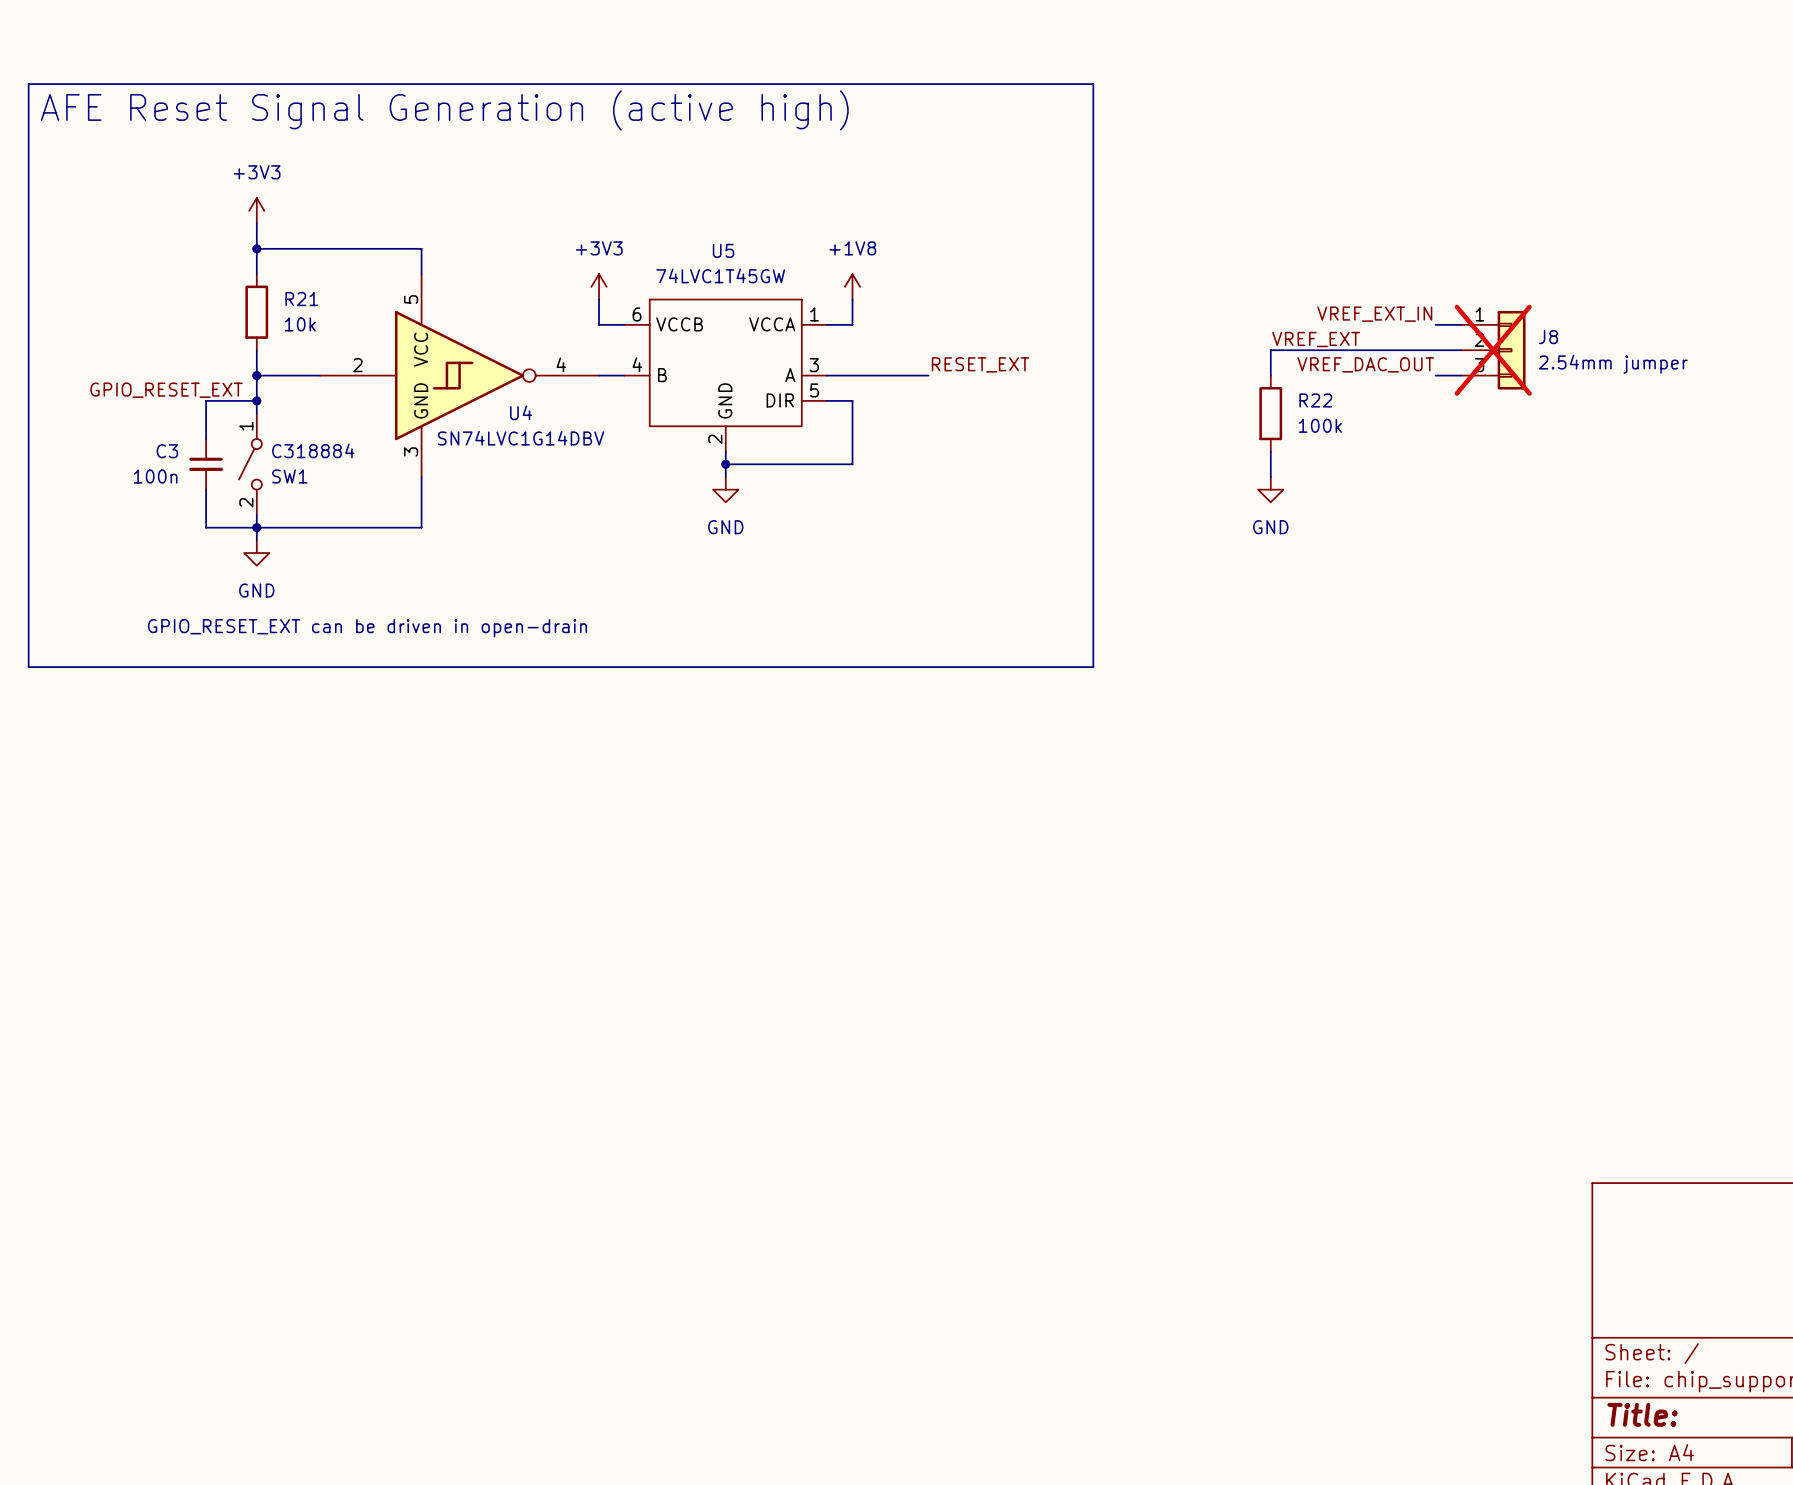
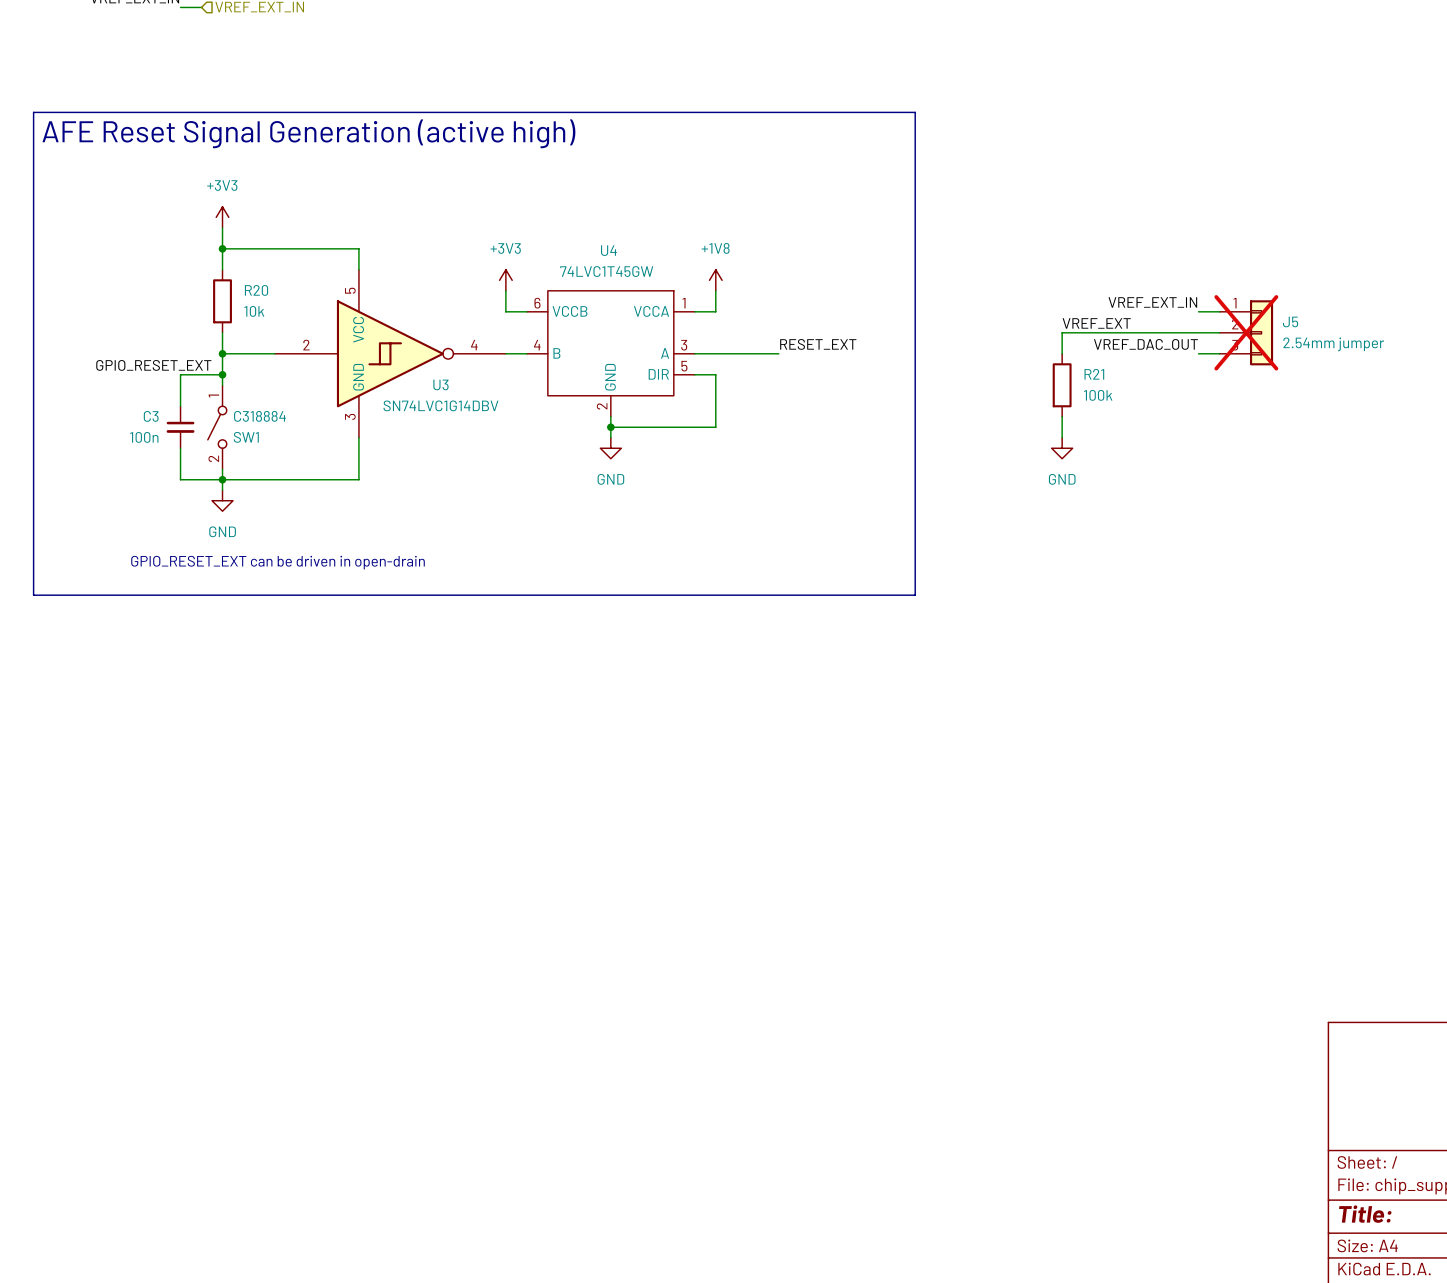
U5 name: U5 (723, 250) -> U4 (608, 250)
R21 name: R21 (301, 299) -> R20 (256, 290)
J8 name: J8 (1548, 337) -> J5 (1290, 321)
R22 name: R22 (1315, 400) -> R21 (1094, 374)
U4 name: U4 (521, 412) -> U3 (440, 384)

